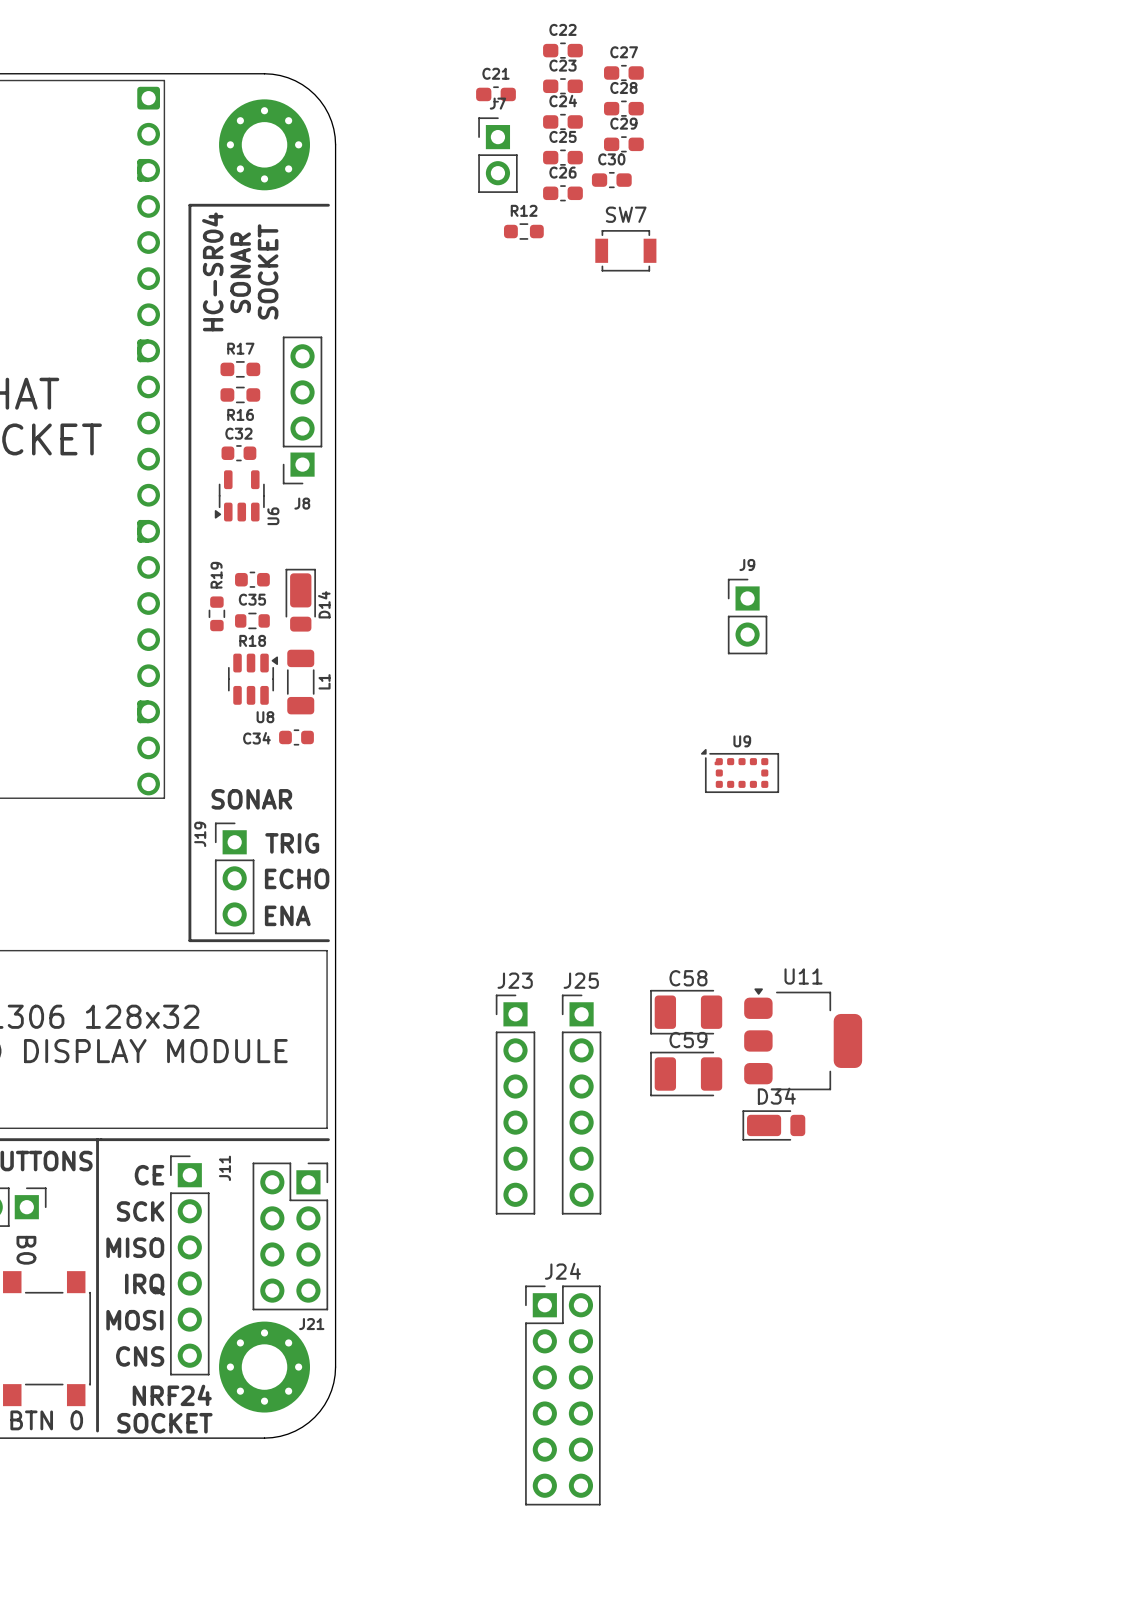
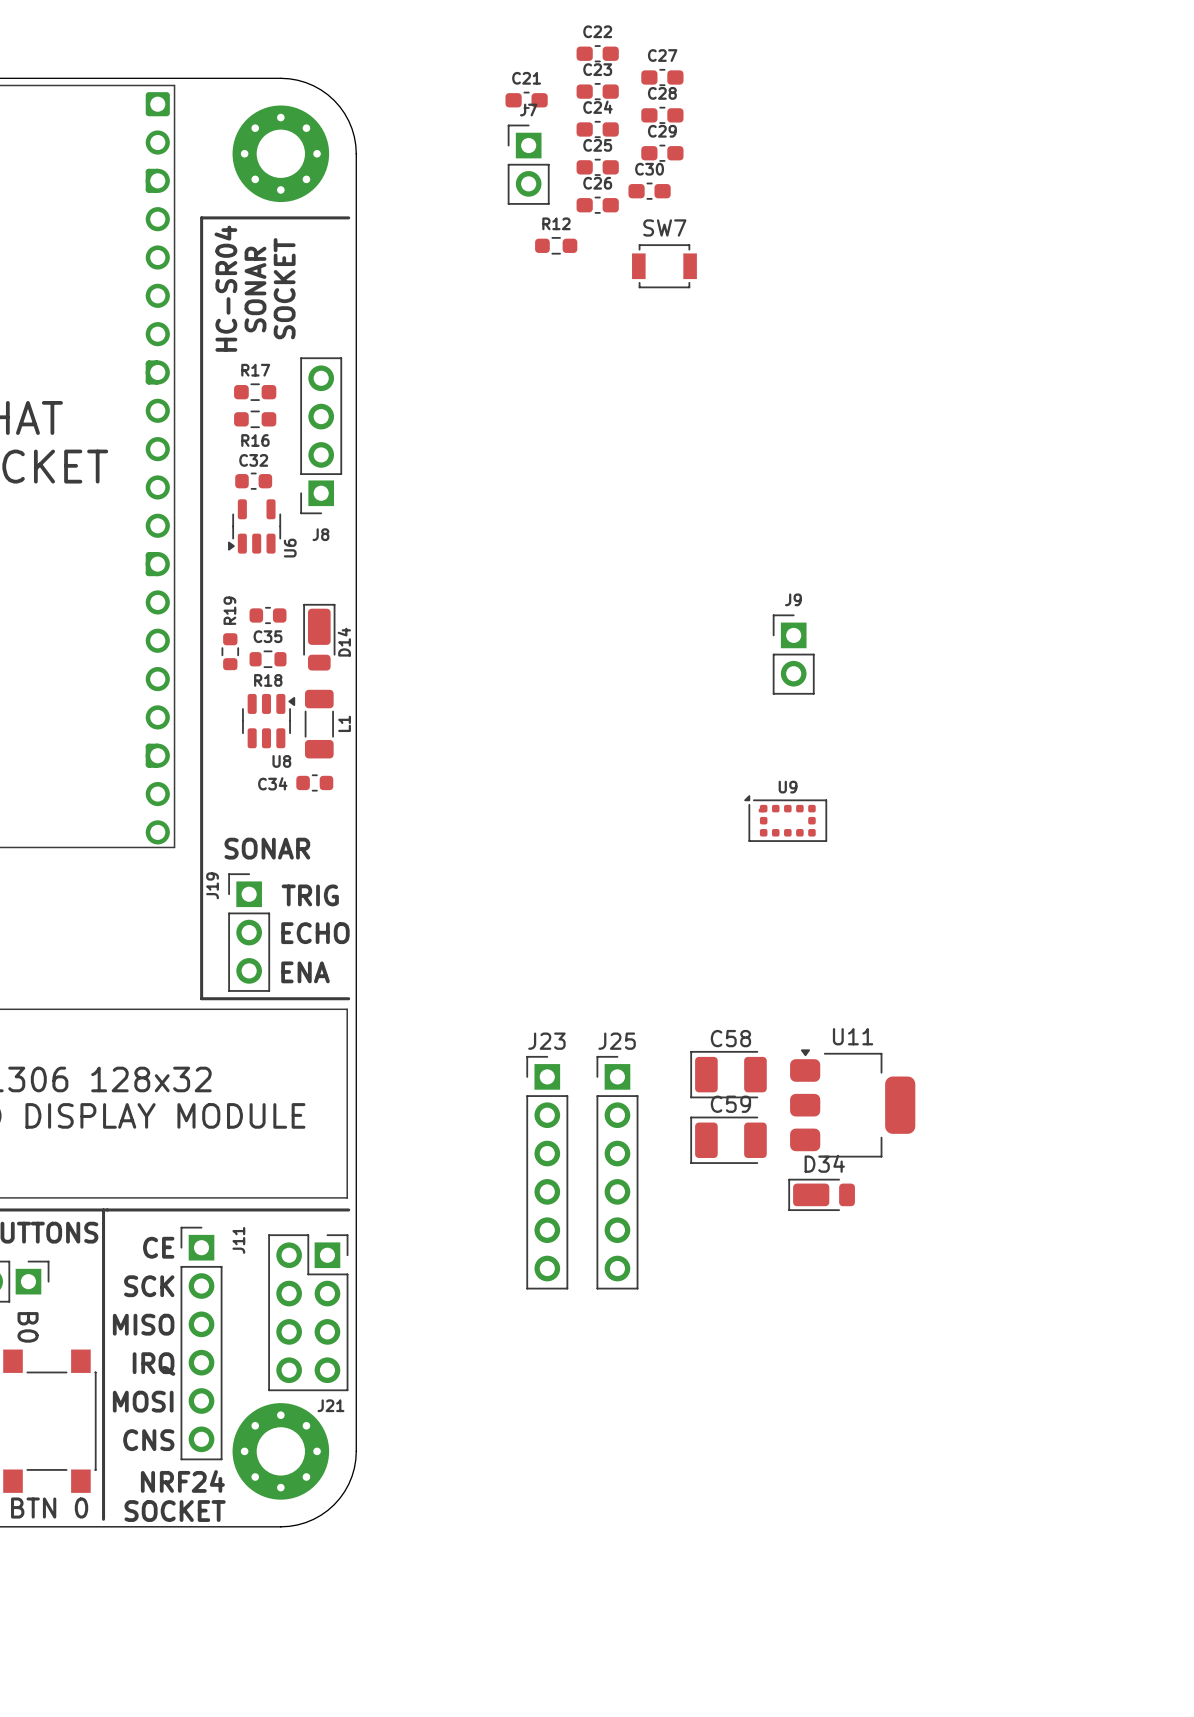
J24: (562, 1395) -> none

